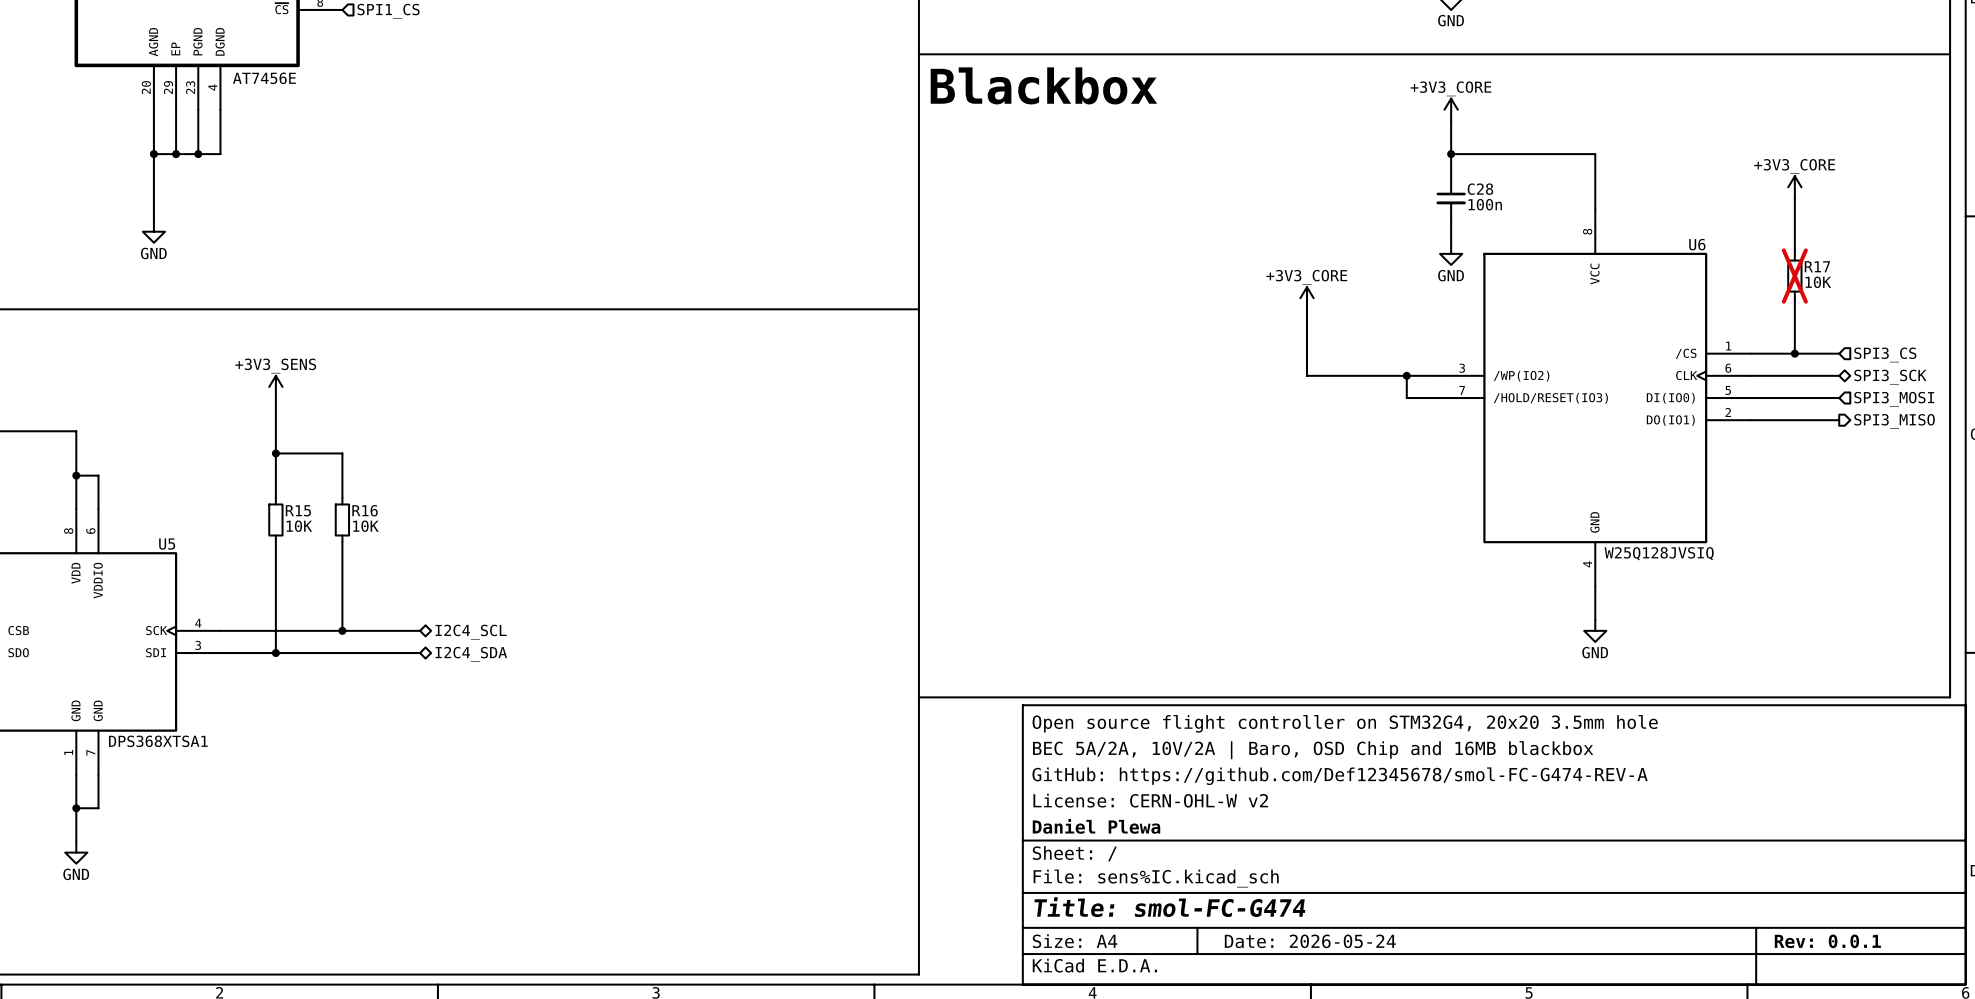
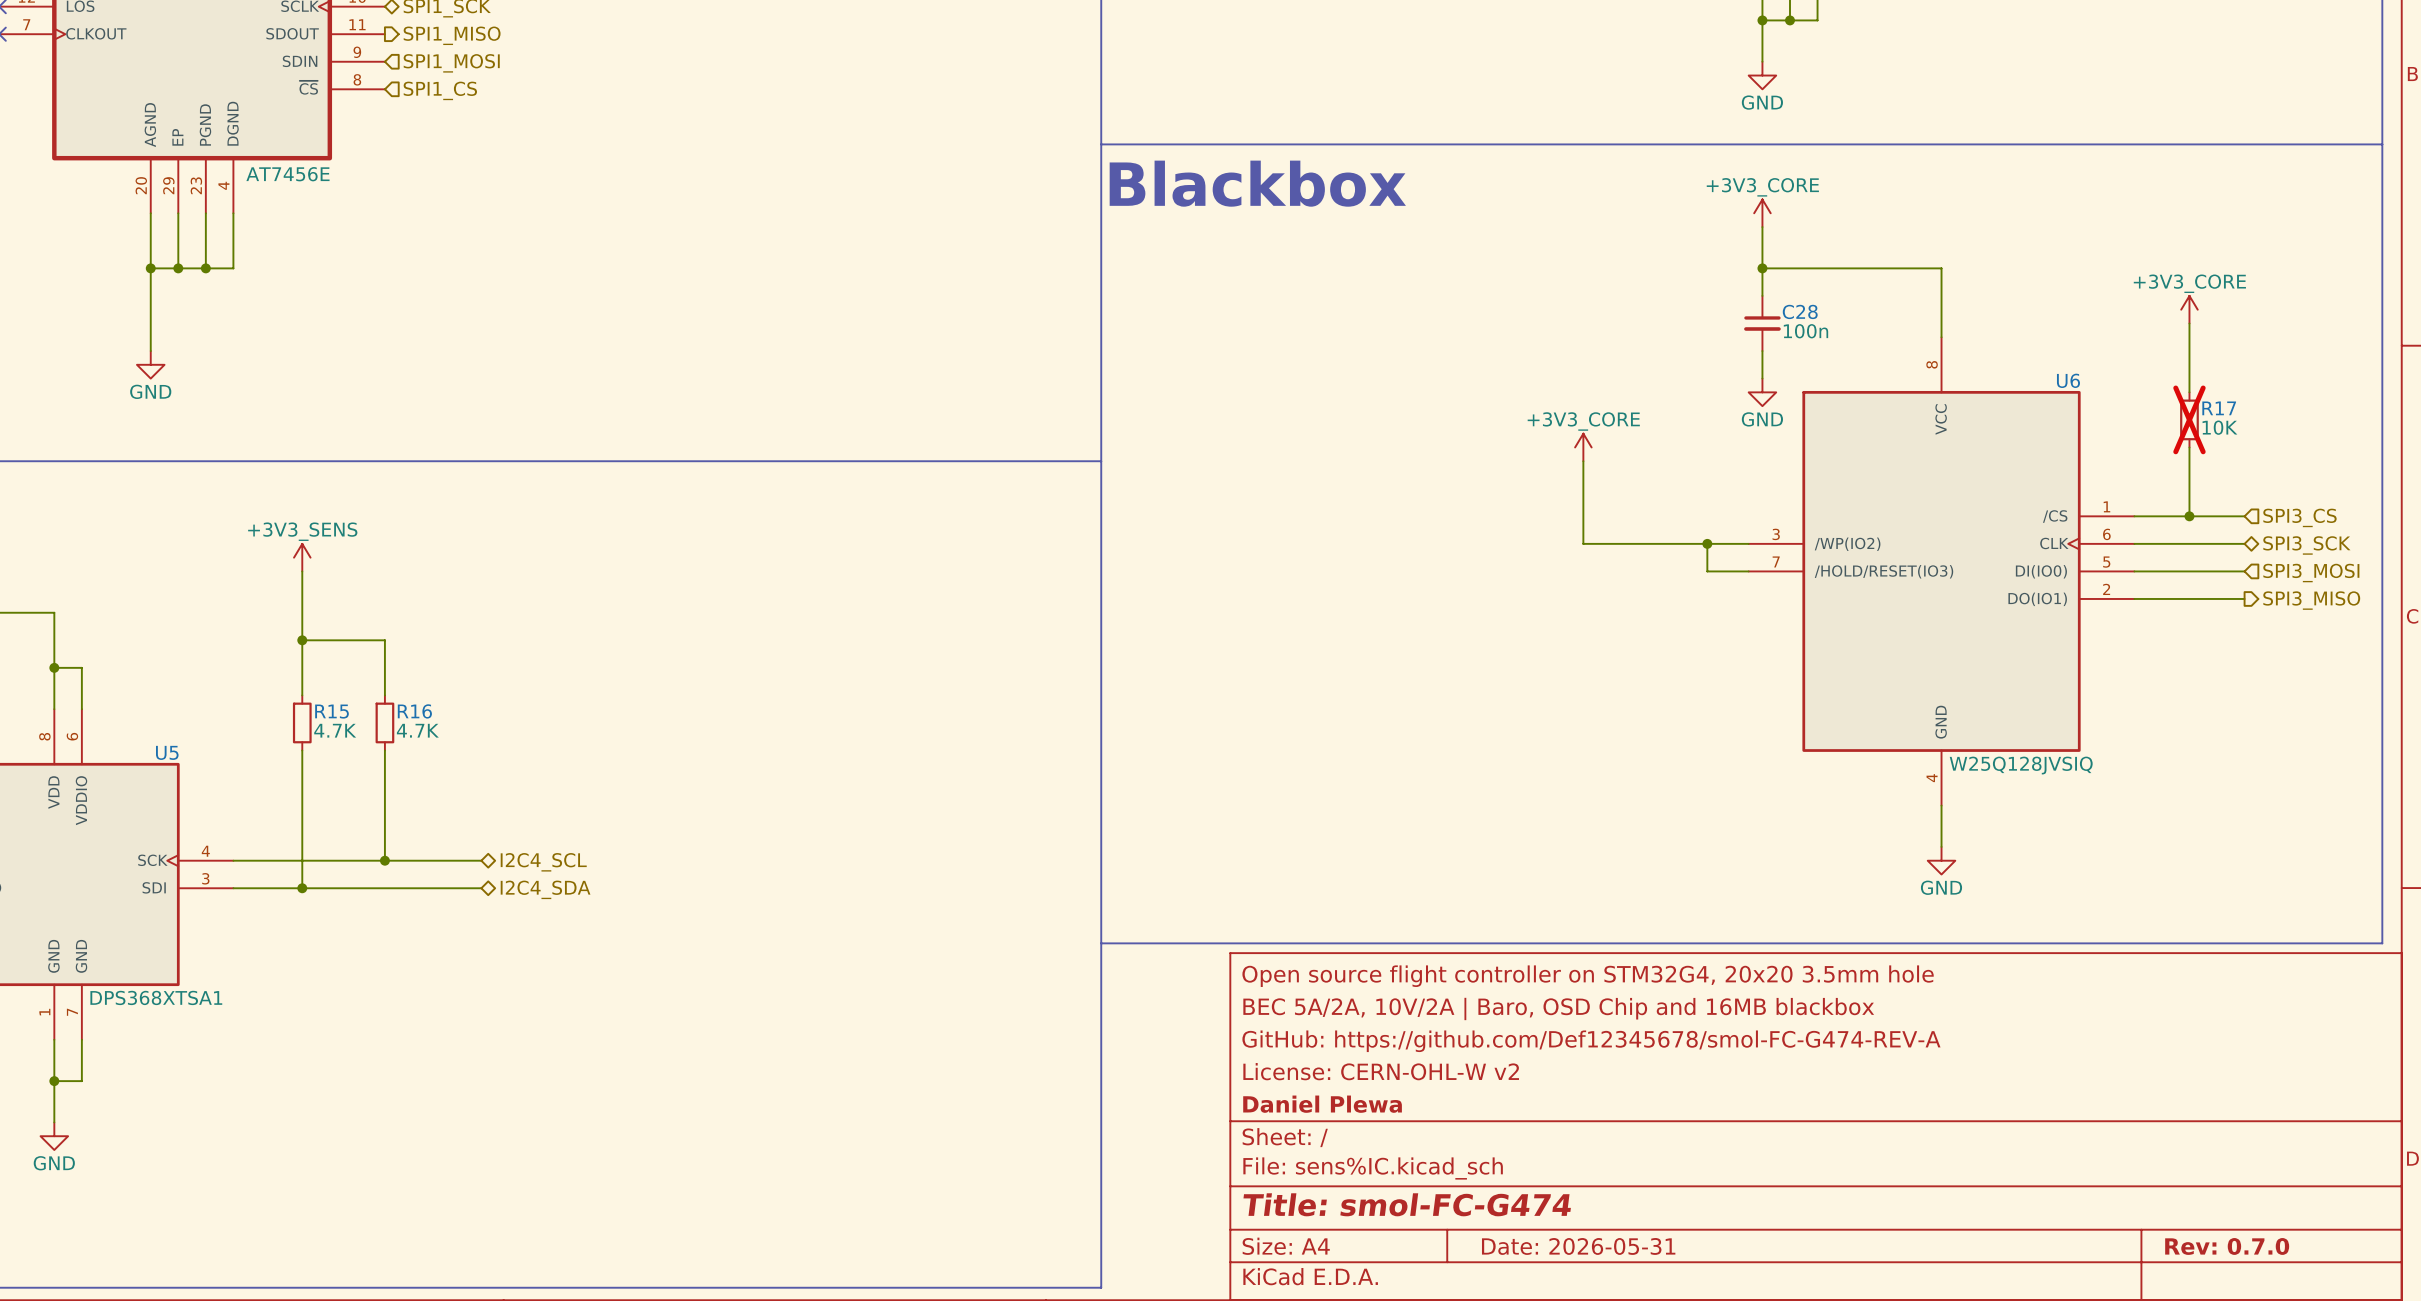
R15 value: 10K (299, 526) -> 4.7K (335, 730)
R16 value: 10K (365, 526) -> 4.7K (417, 730)
title block: Date: 2026-05-24 (1310, 941) -> Date: 2026-05-31 (1578, 1246)
title block: Rev: 0.0.1 (1827, 941) -> Rev: 0.7.0 (2227, 1246)

